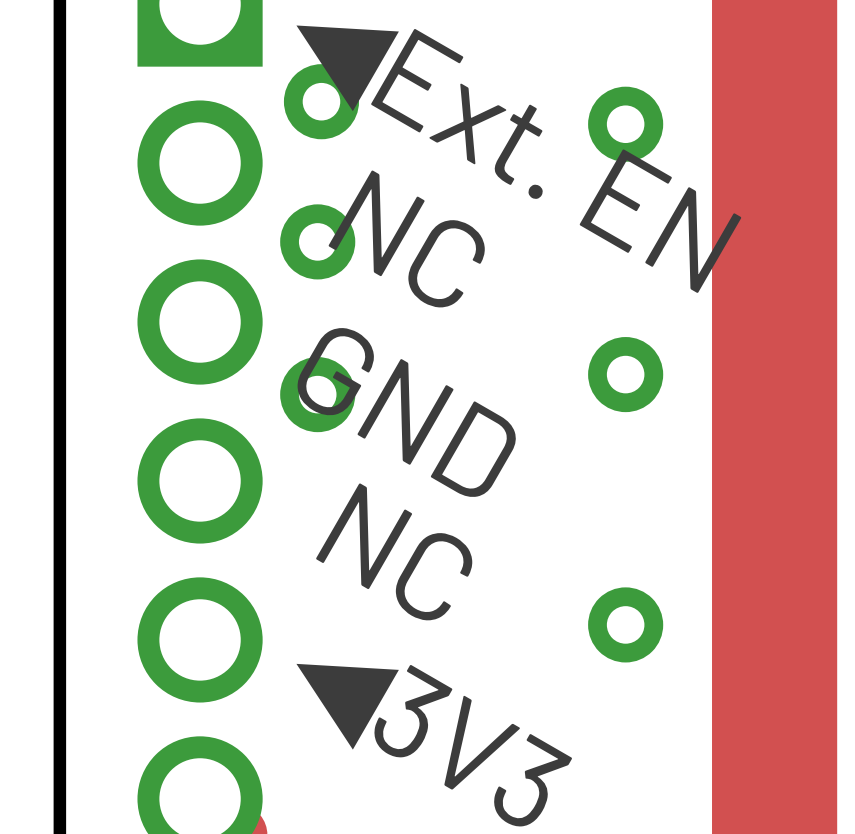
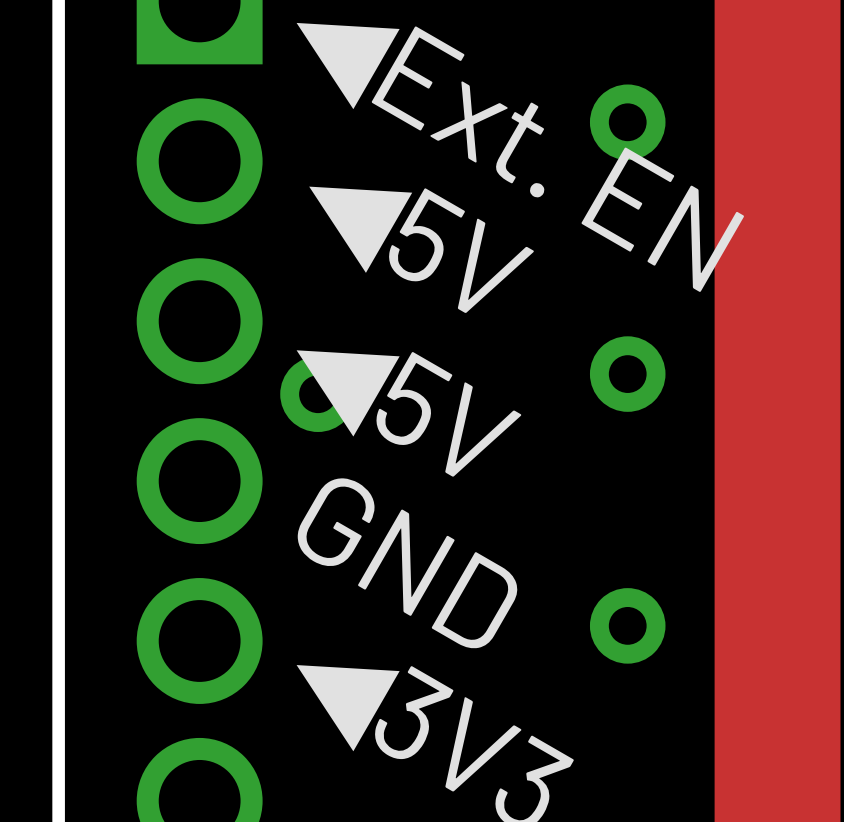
via: (321, 101) -> none
text: NC (406, 238) -> ◀5V (421, 249)
via: (317, 241) -> none
text position: GND (407, 413) -> GND (408, 563)
text: none -> ◀5V (409, 413)
text: NC (394, 551) -> none

